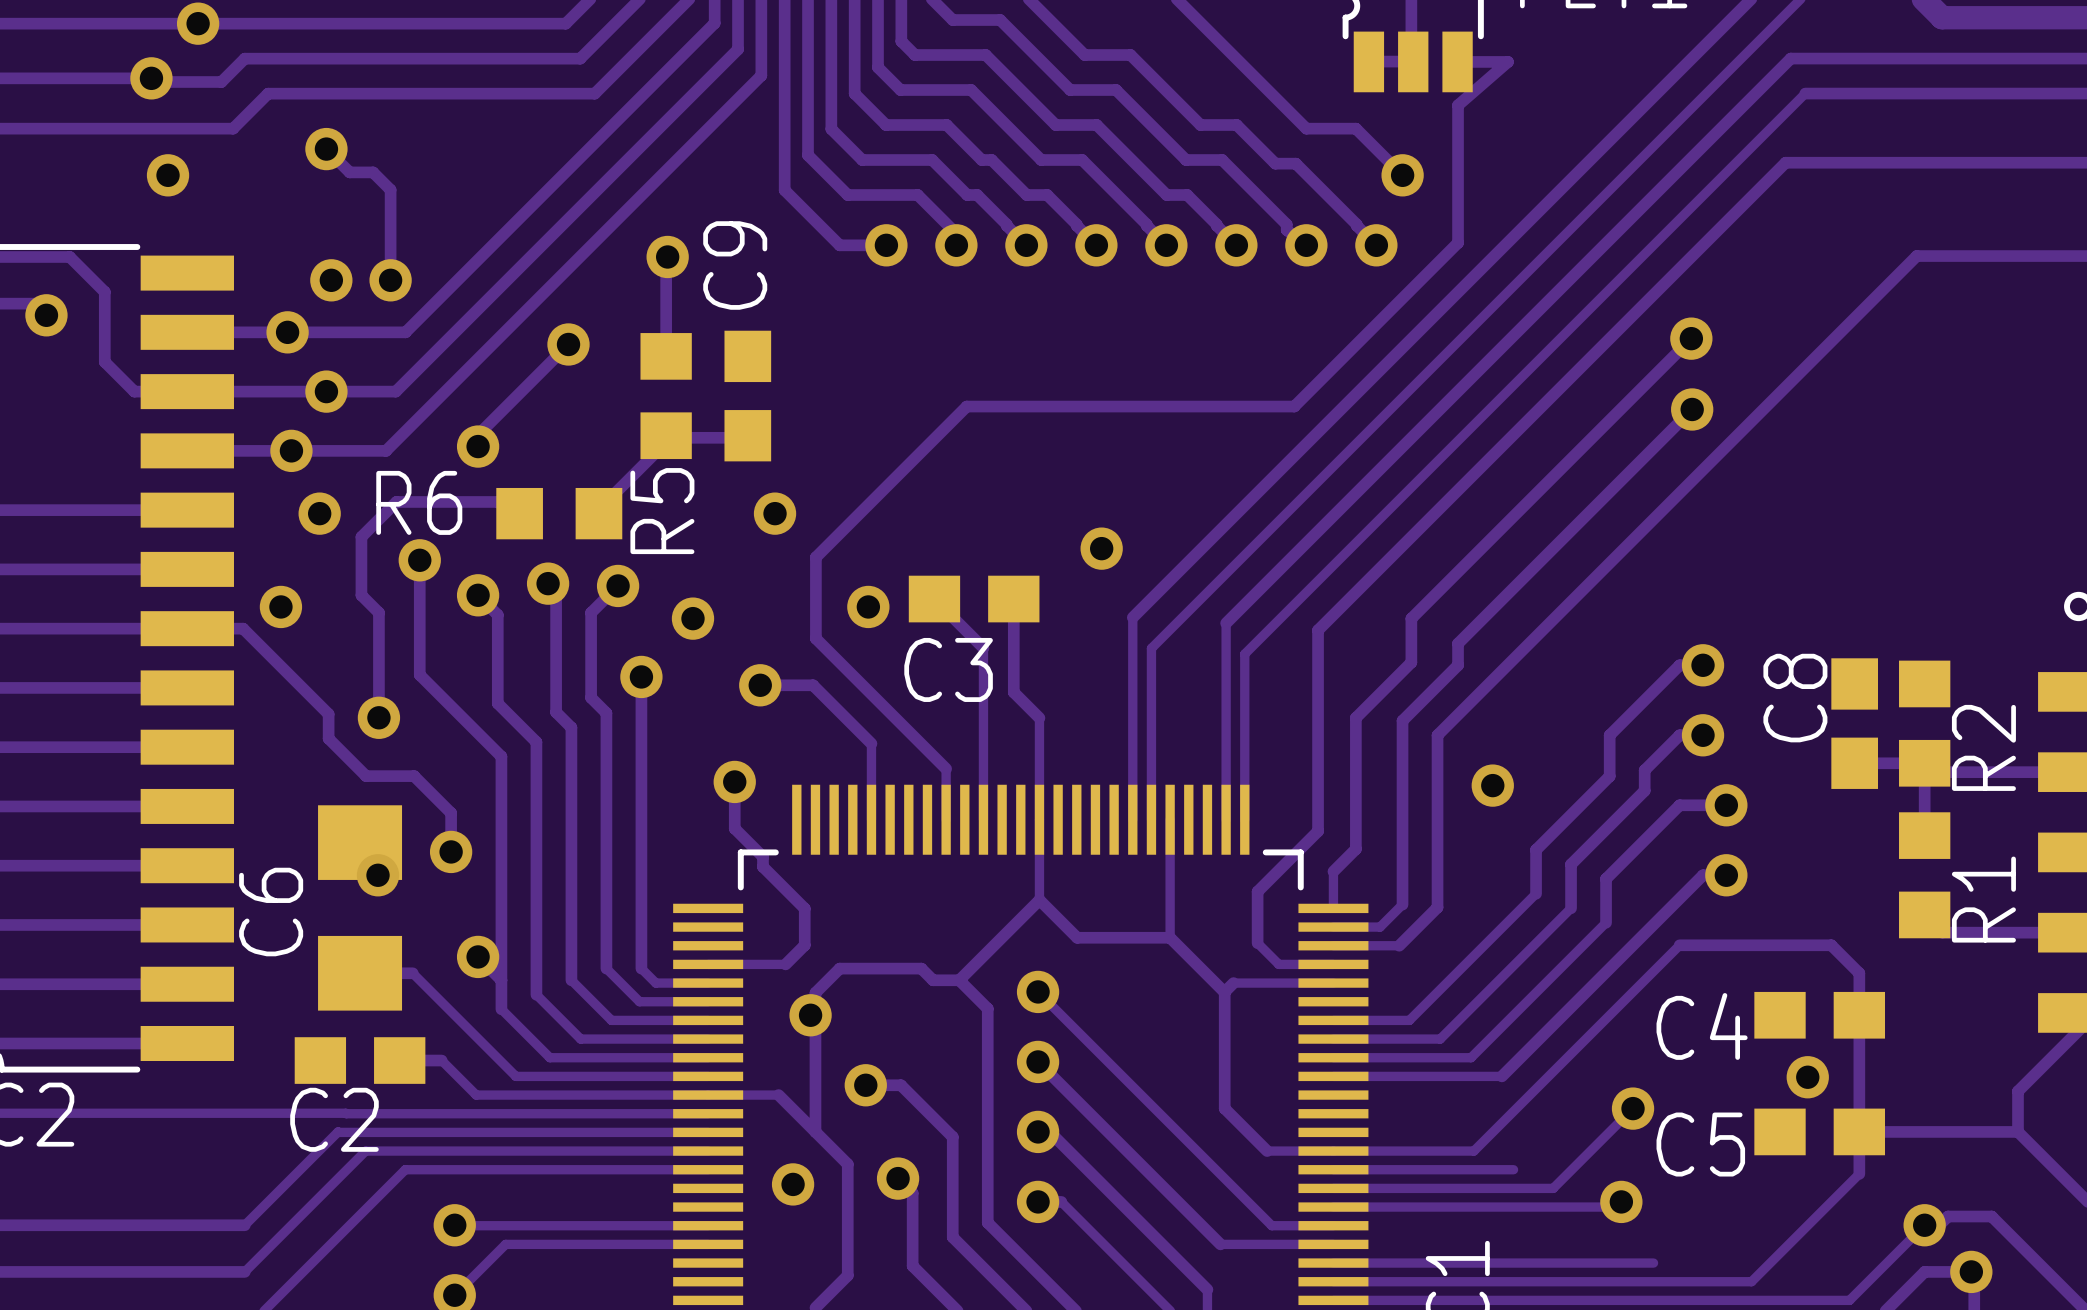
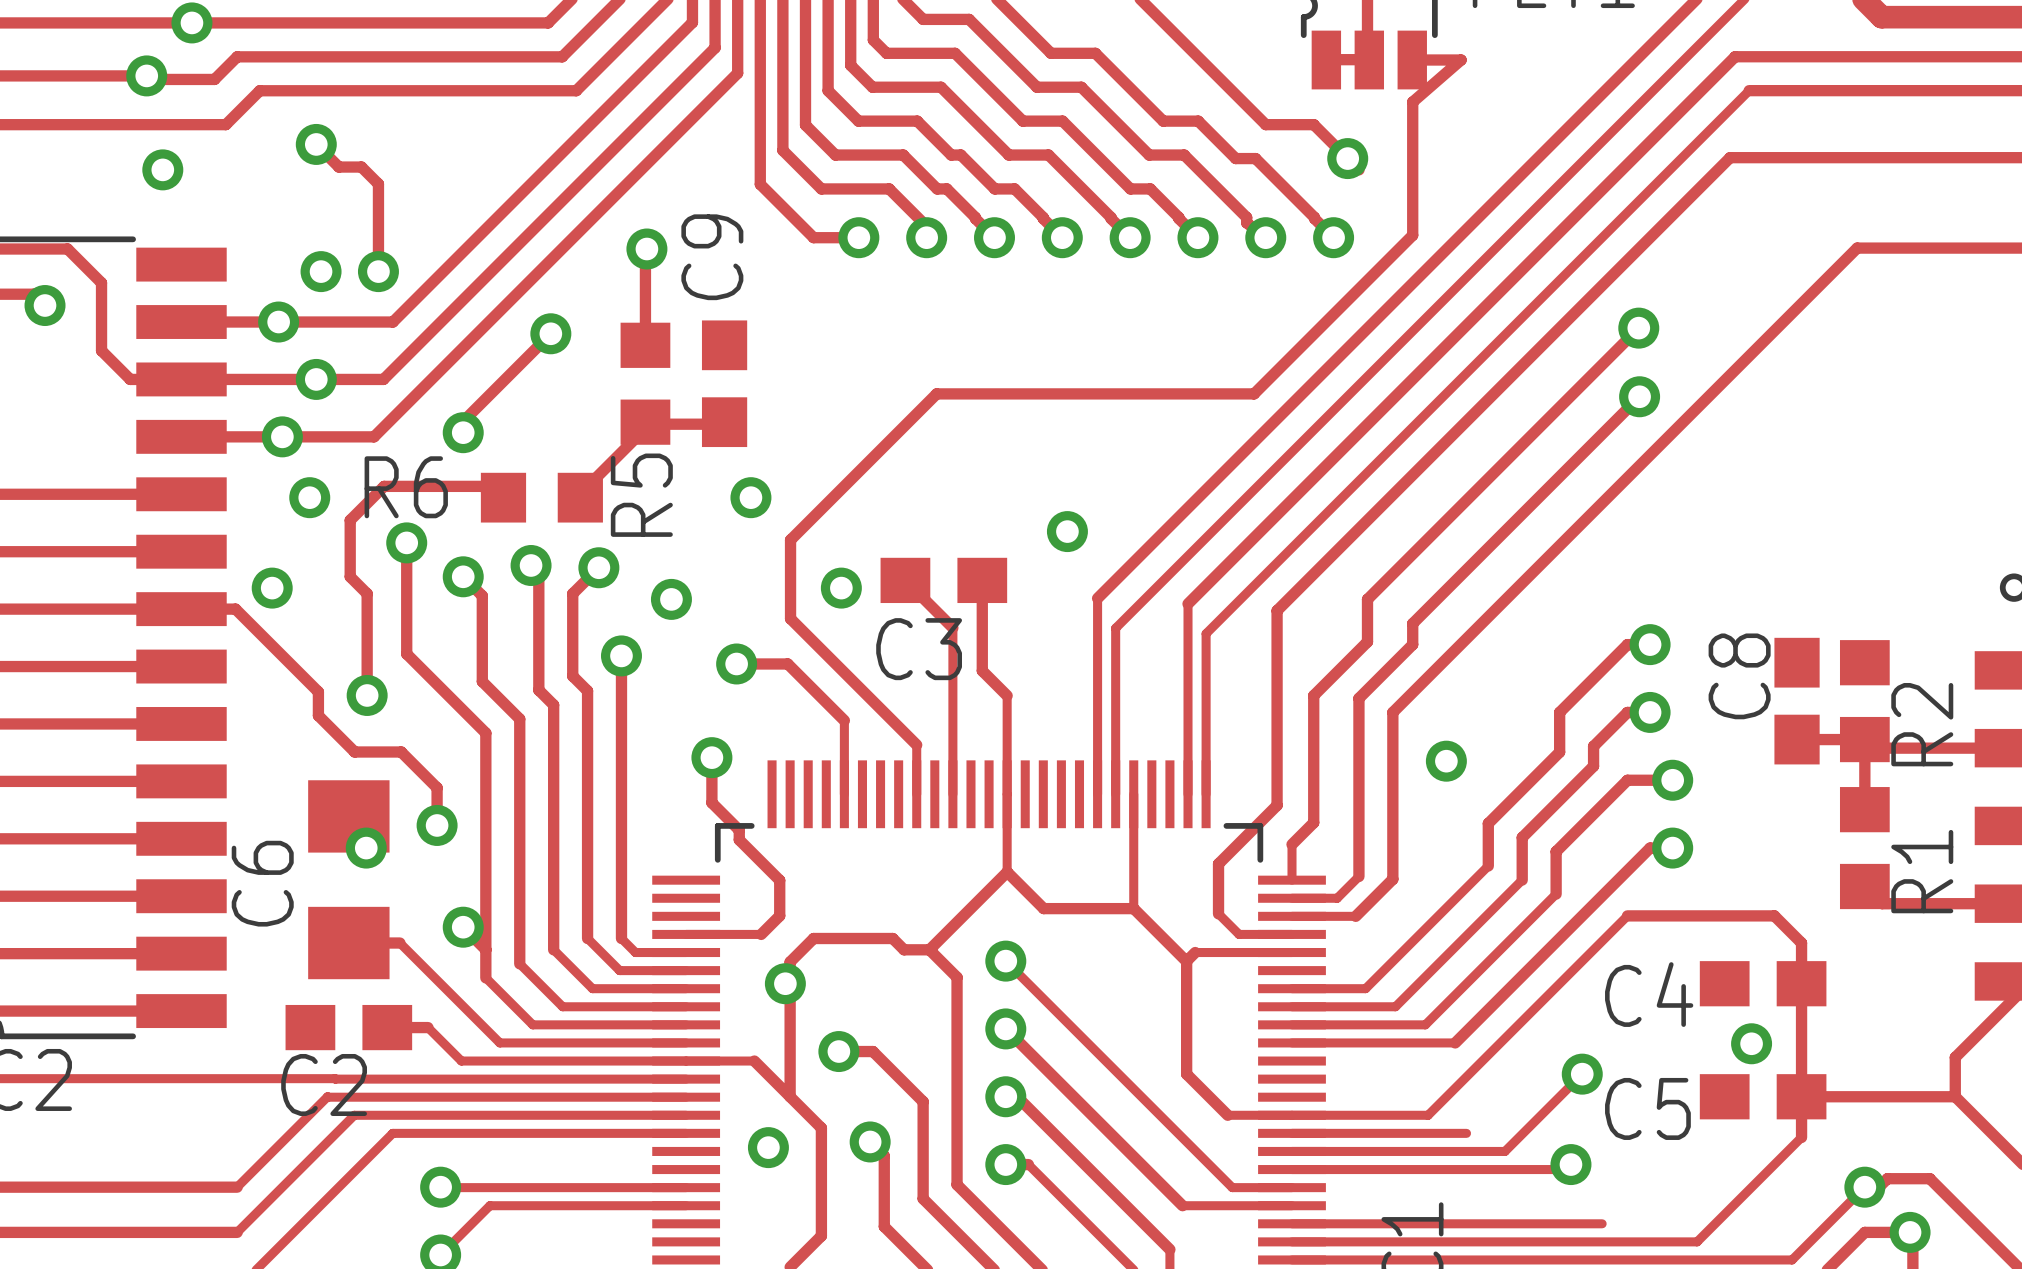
via position: (1402, 175) -> (1347, 158)

